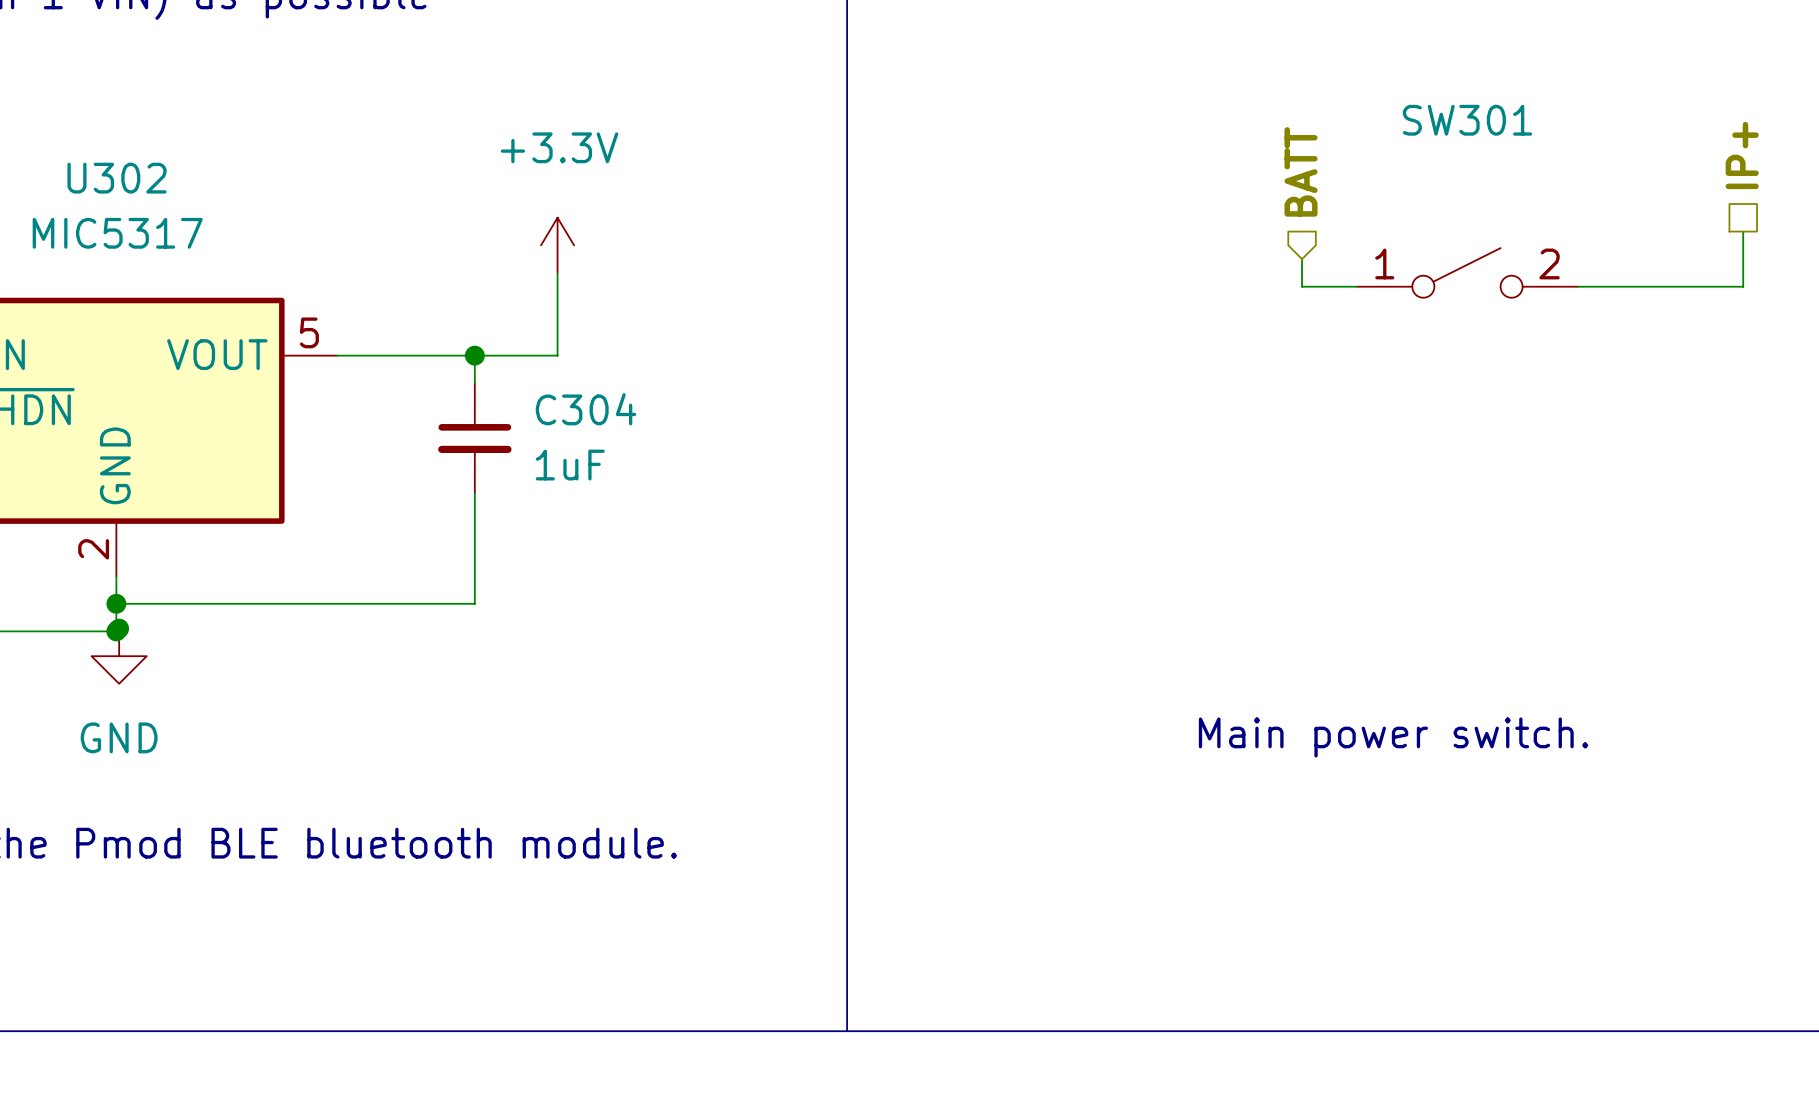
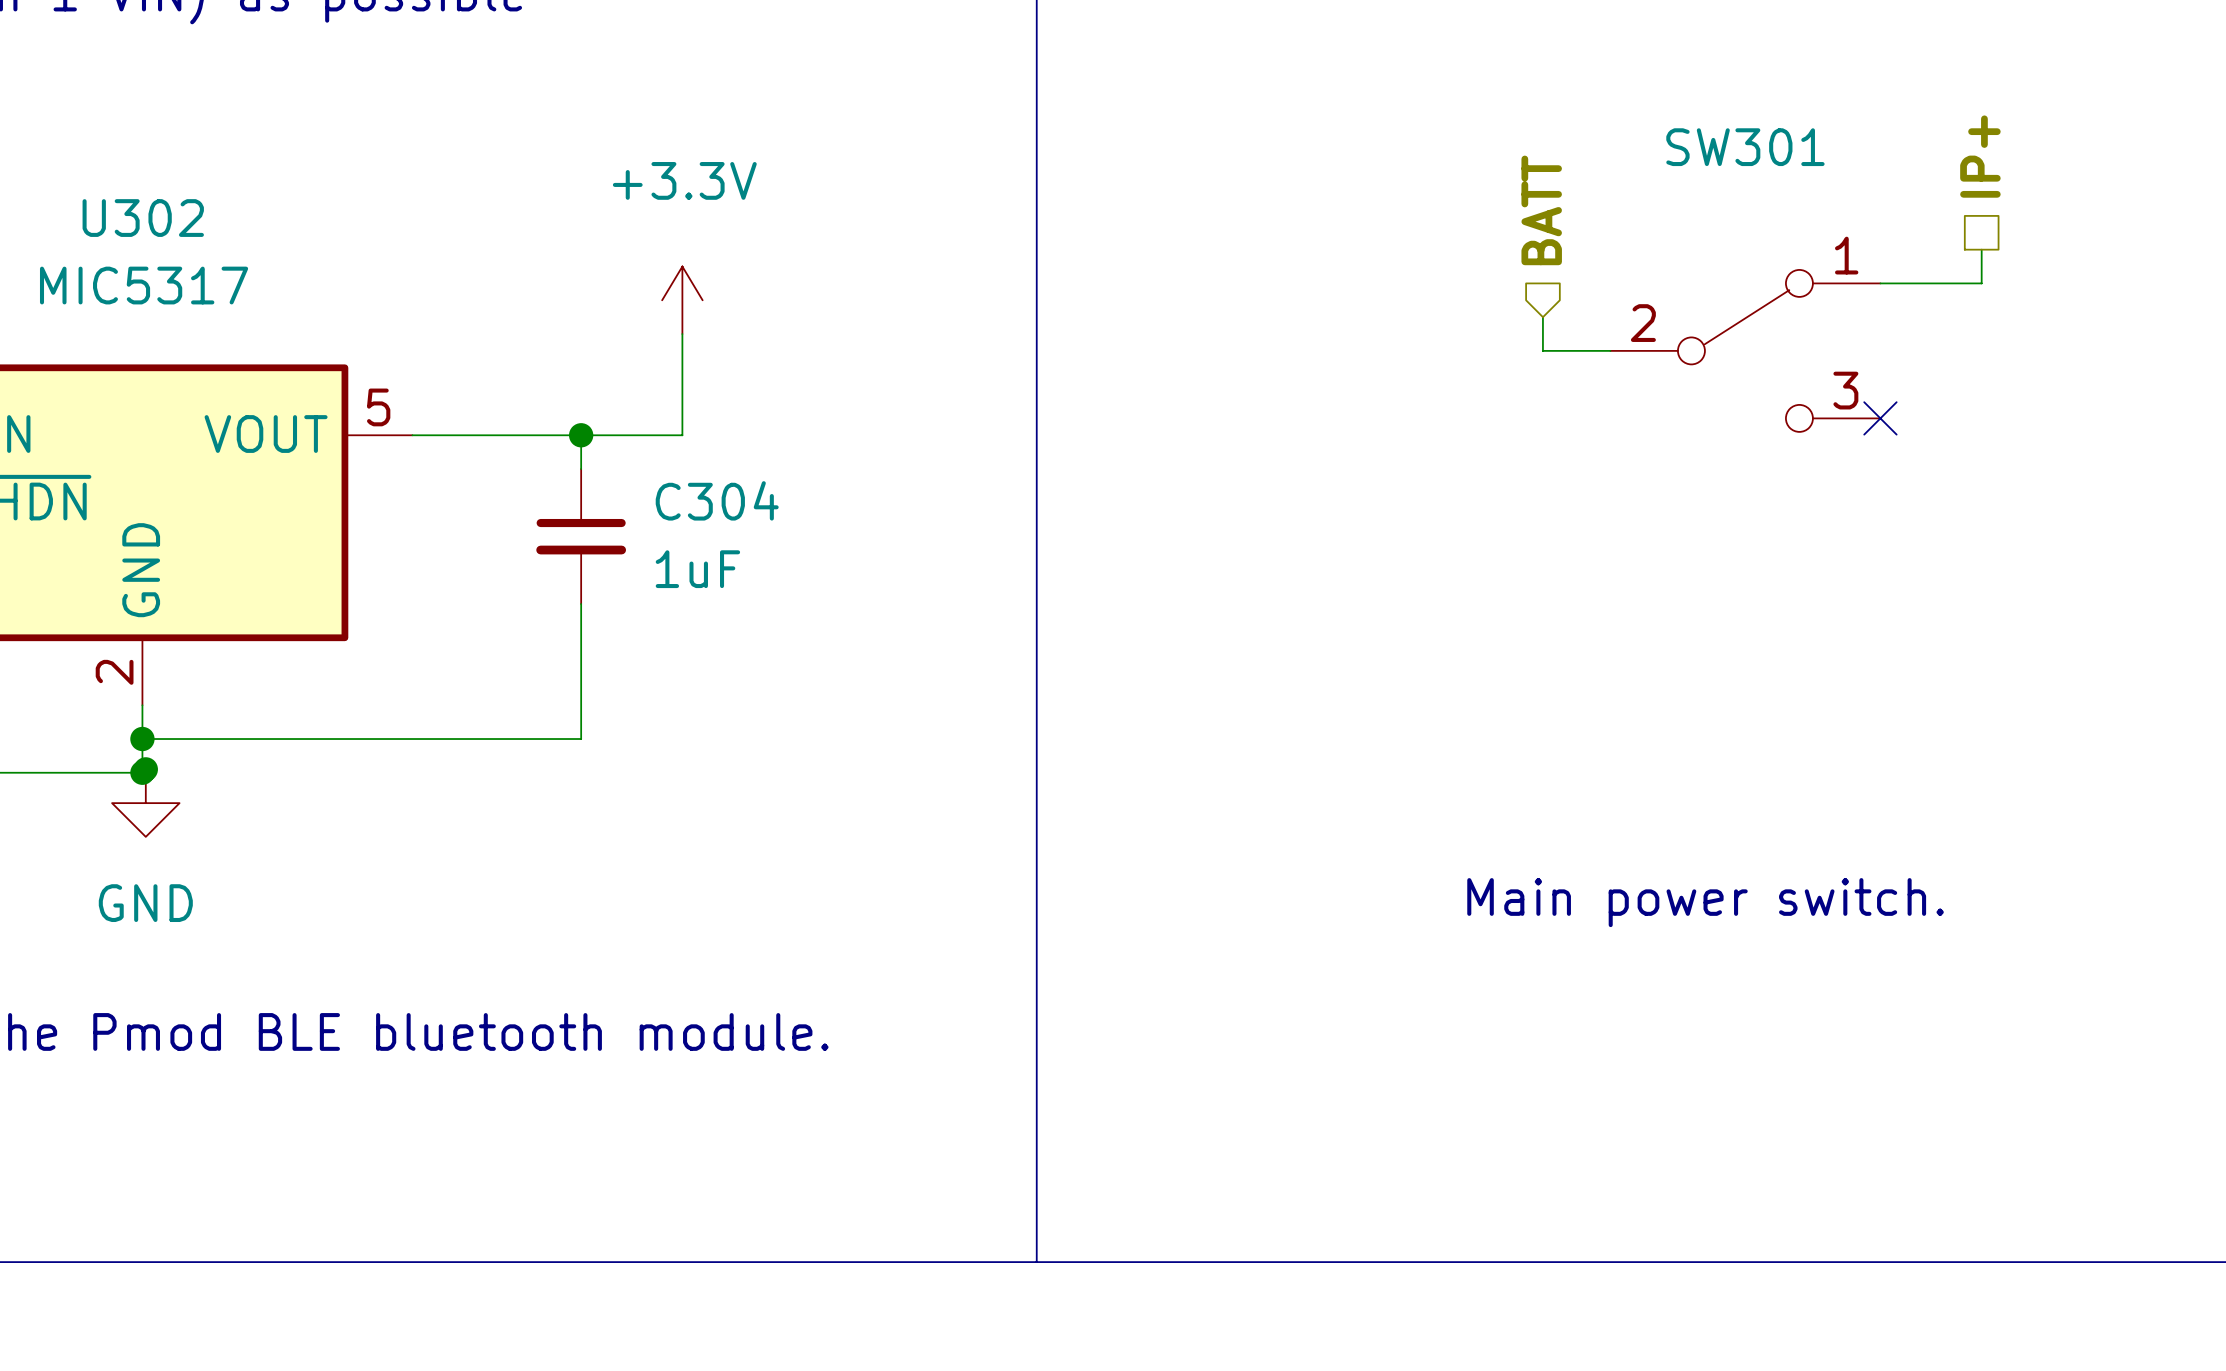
hierarchical label position: IP+ (1742, 155) -> IP+ (1980, 156)
hierarchical label position: BATT (1301, 171) -> BATT (1541, 210)
wire: none -> (1981, 249) (1981, 283) (1880, 283)
wire: (1743, 231) (1743, 286) (1577, 286) -> none
SW301 symbol: [1357, 248, 1578, 298] -> [1610, 269, 1881, 432]
wire: (1302, 259) (1302, 286) -> (1542, 317) (1542, 350) (1593, 350)
no-connect mark: none -> (1880, 418)

